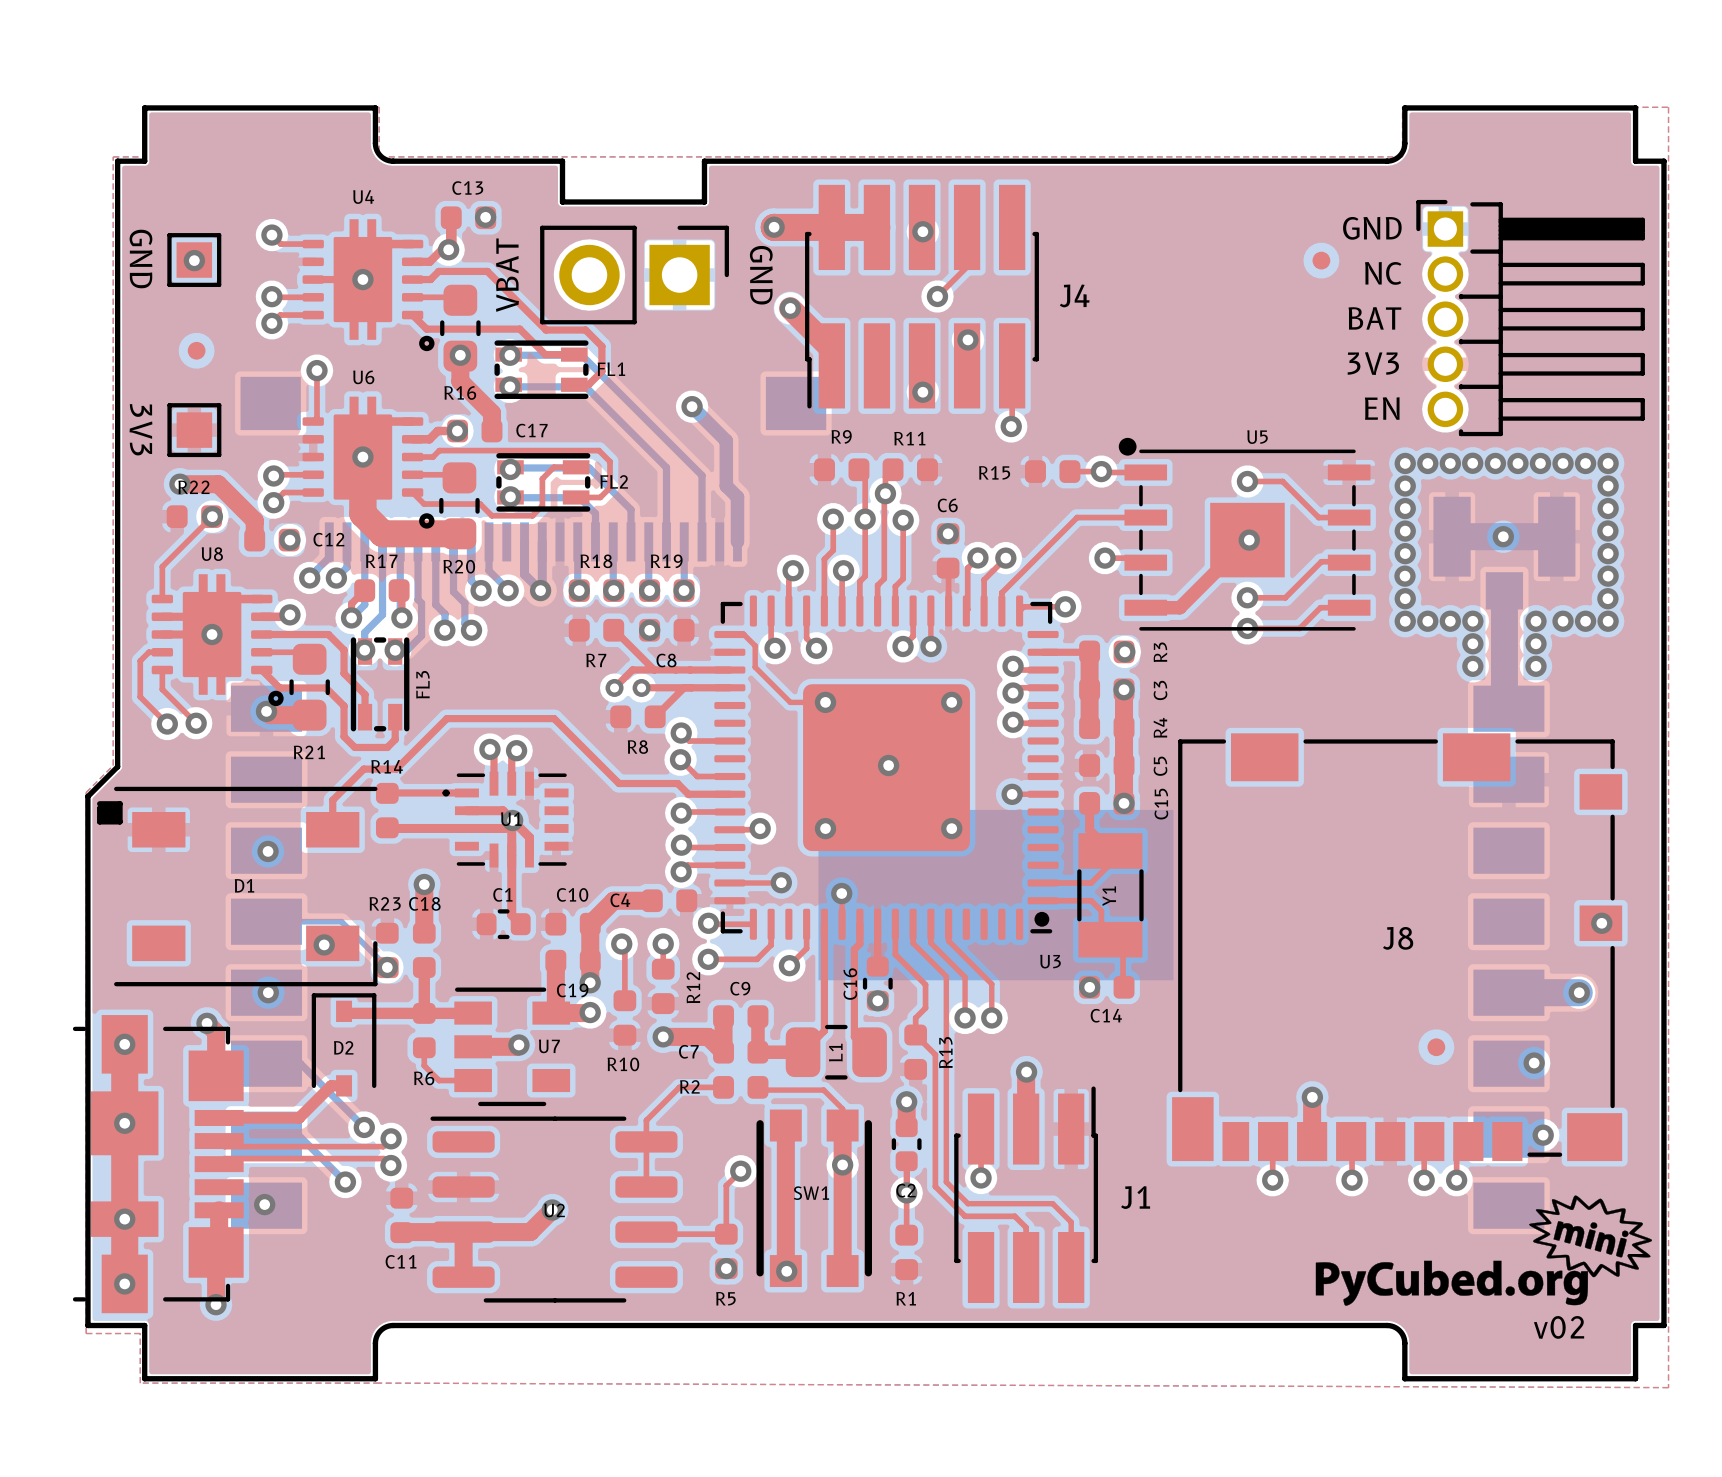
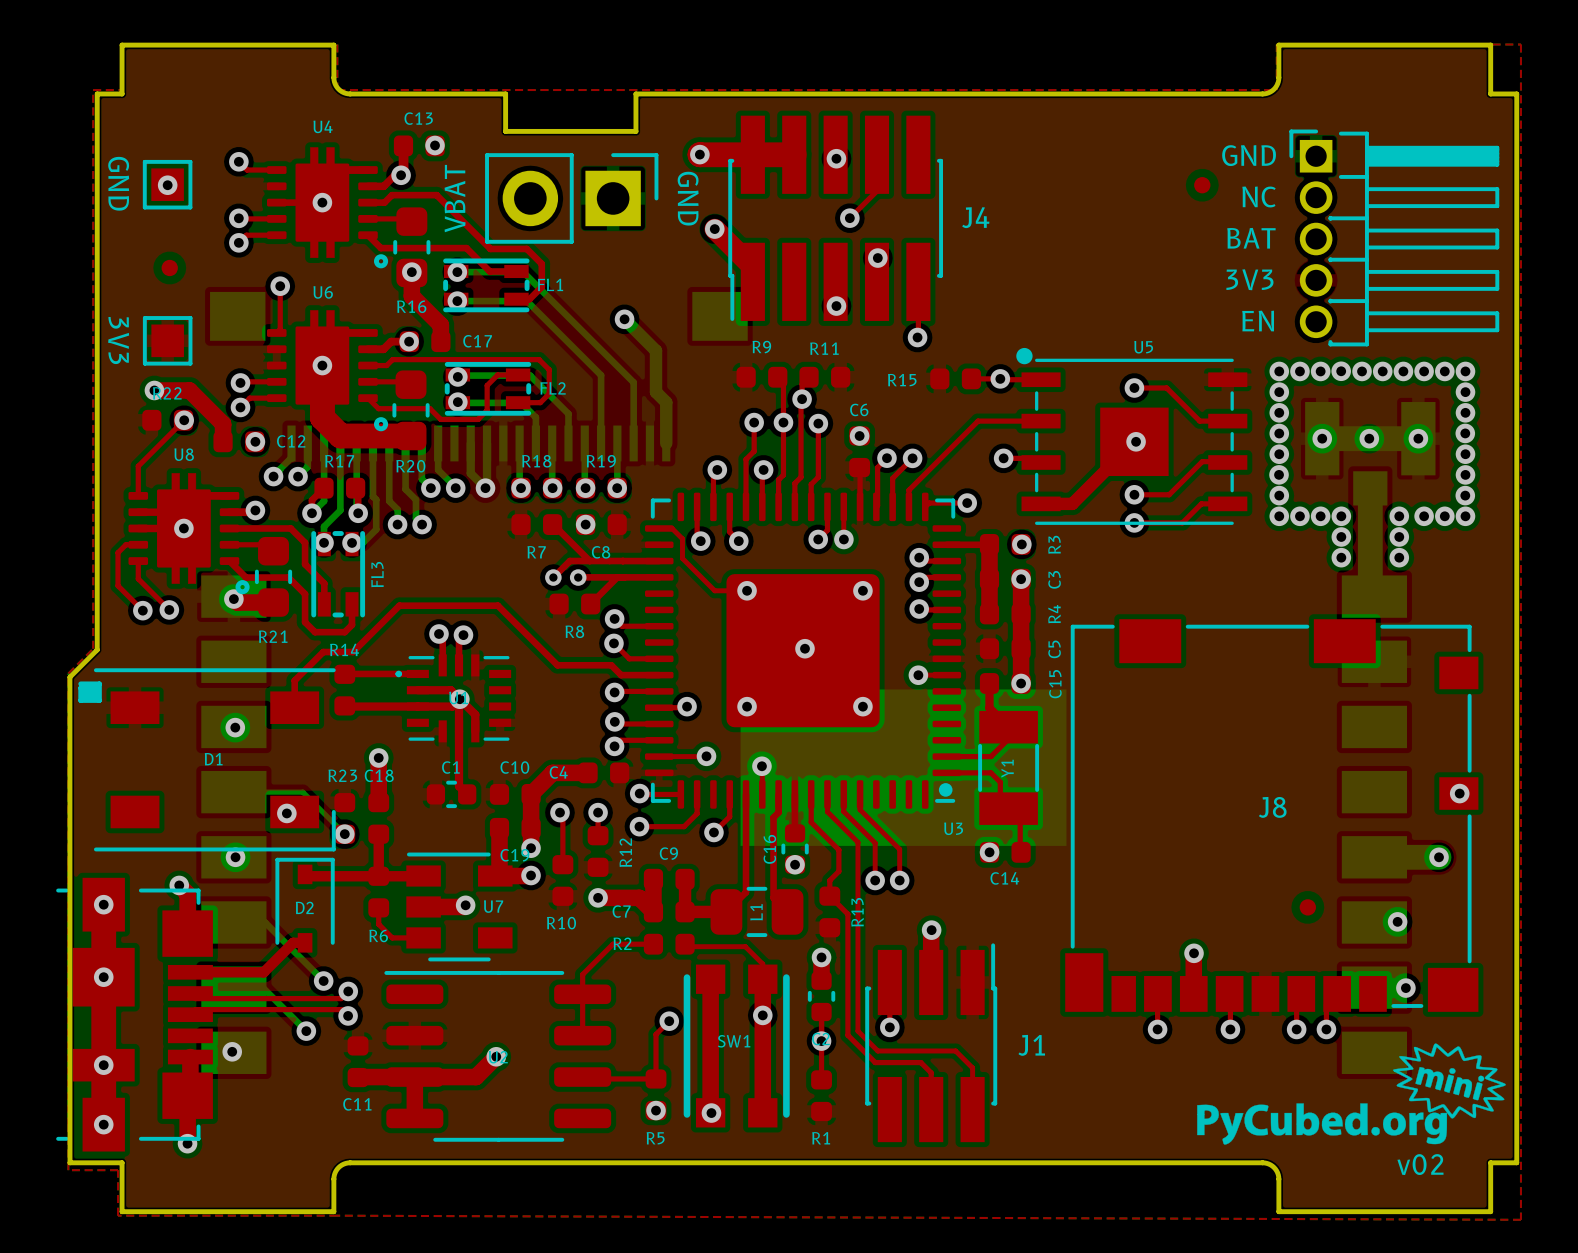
via: none -> (1322, 438)
via: none -> (1418, 438)

